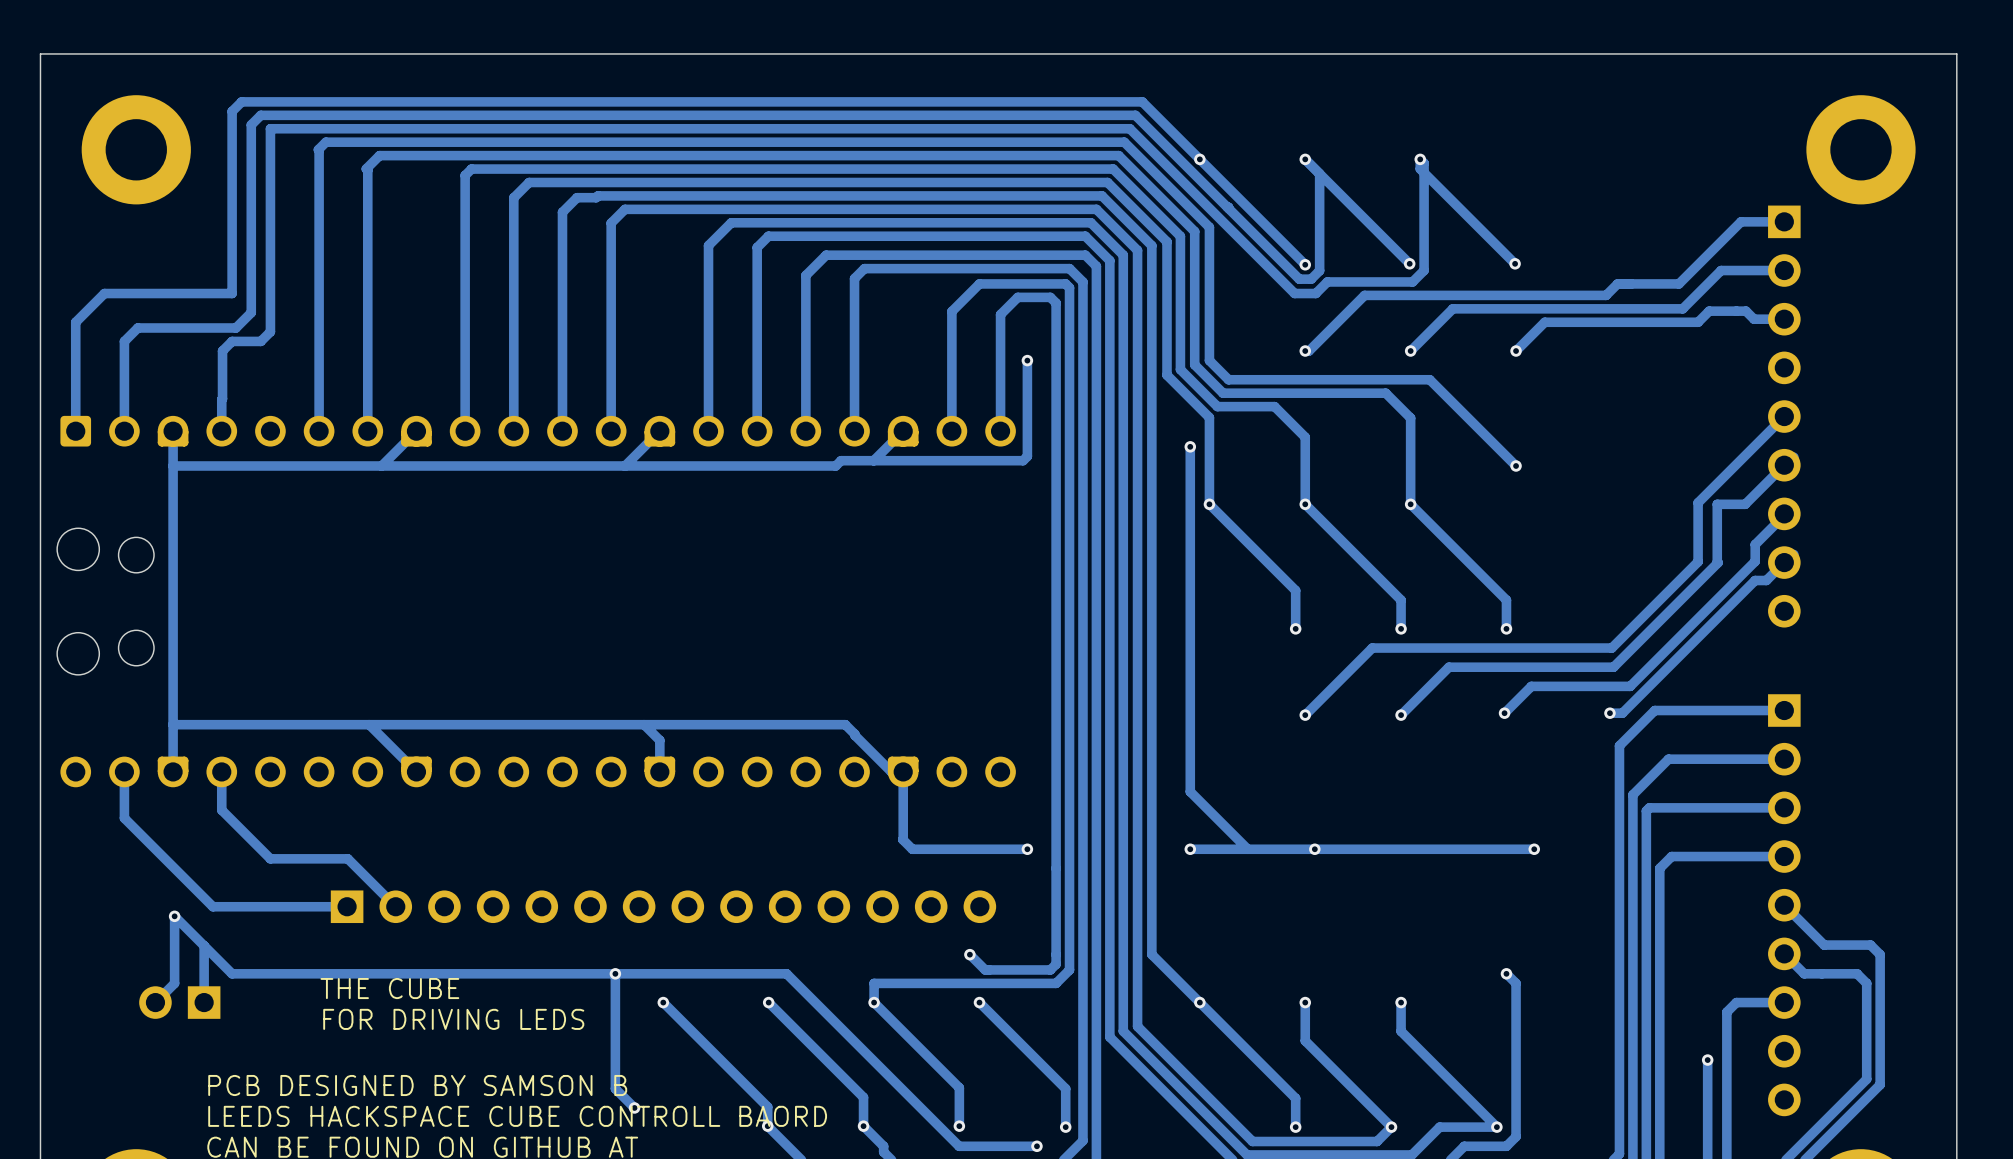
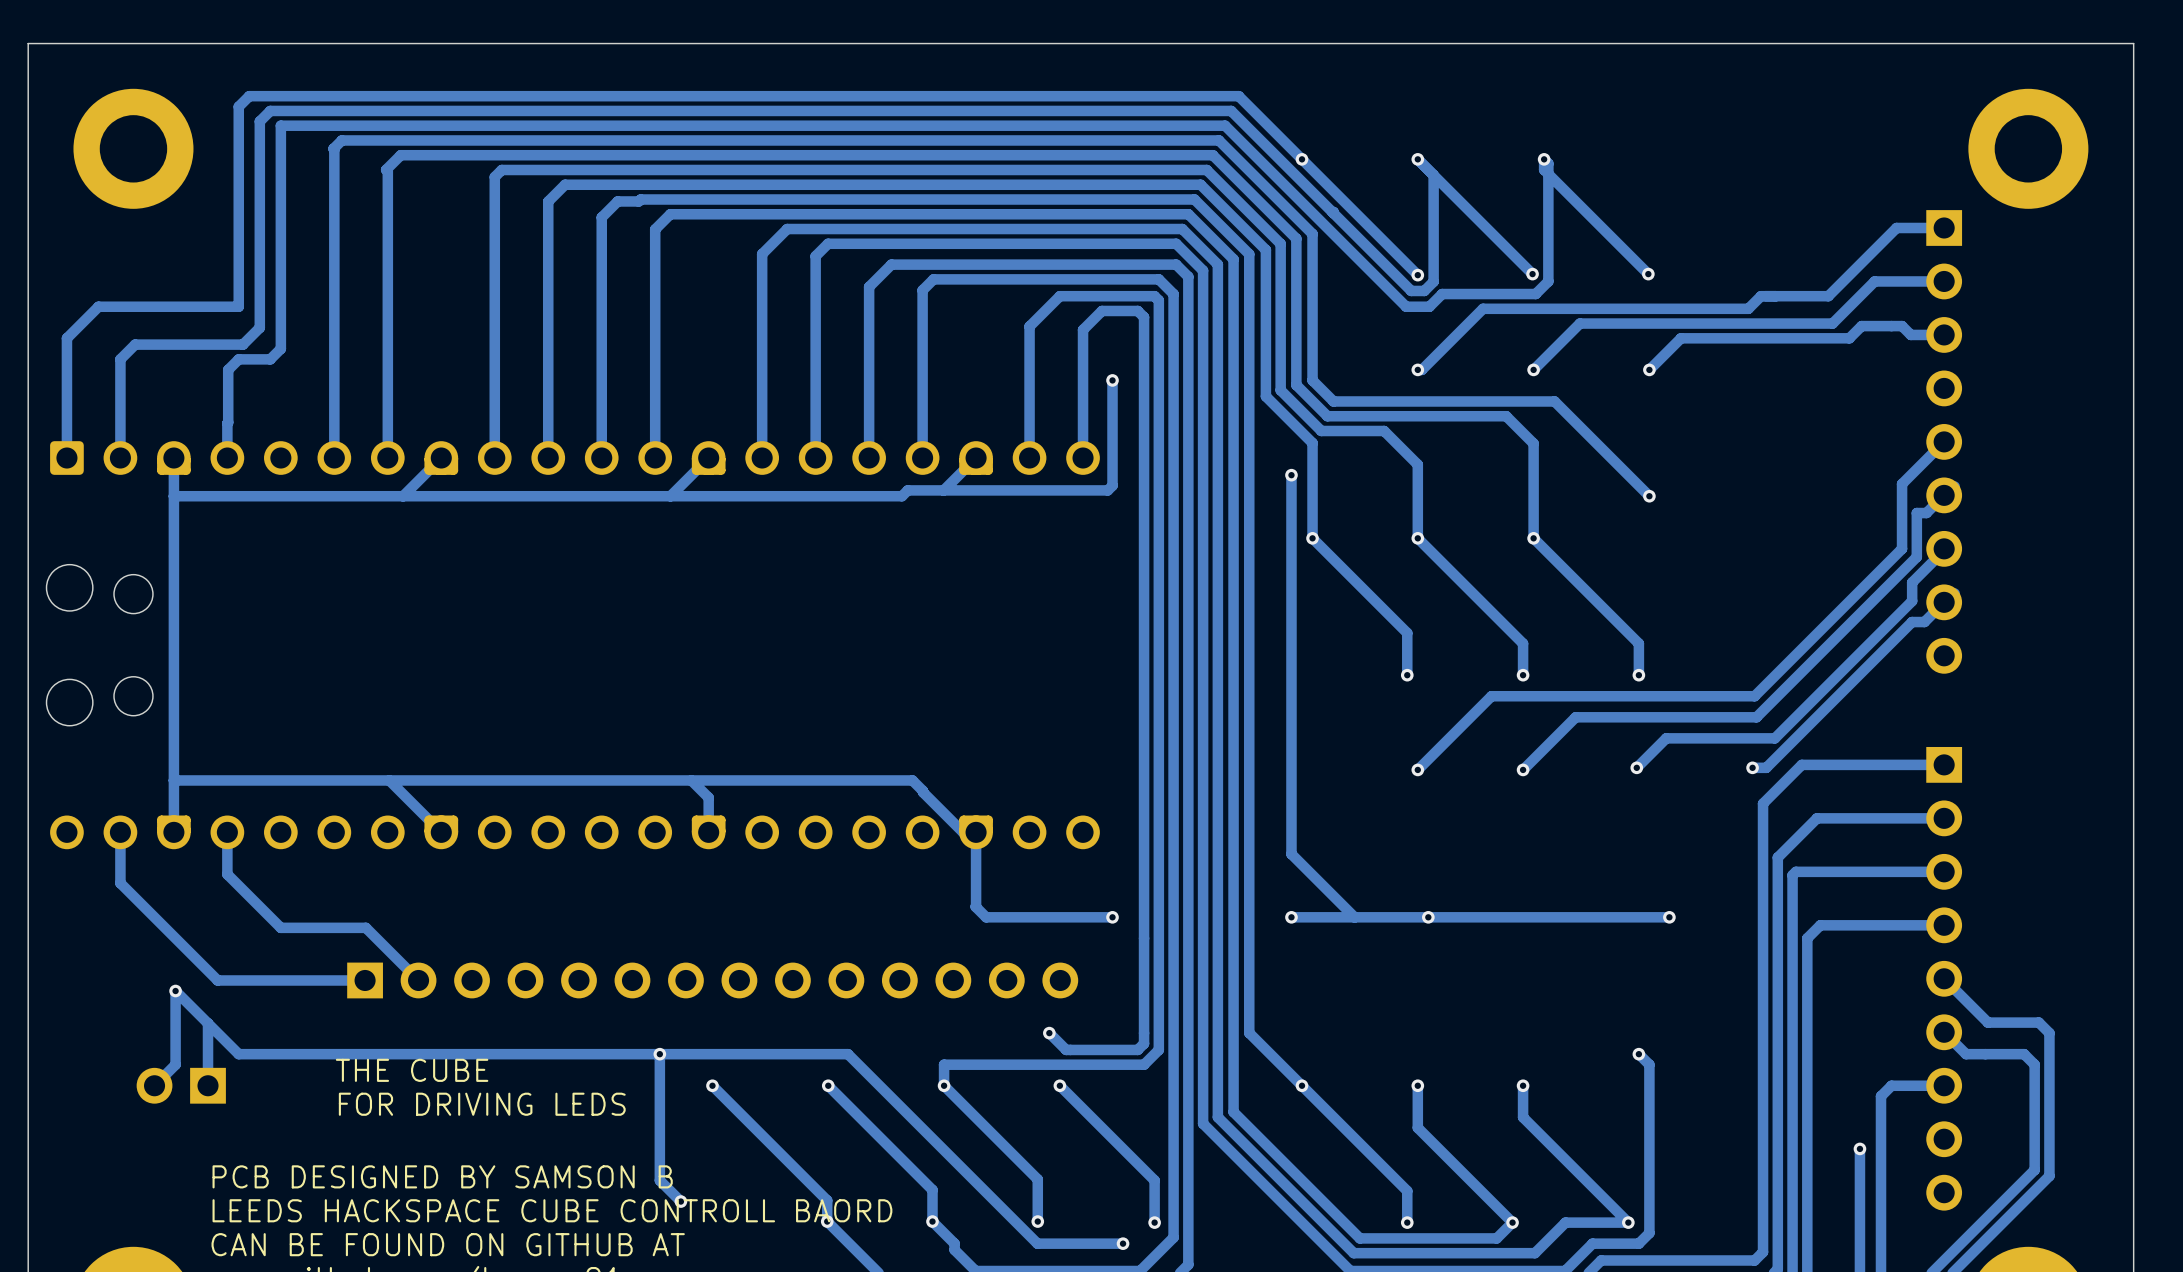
track: (1746, 454) (1698, 502) (1698, 561) -> (1902, 484) (1902, 548) (1849, 601)
track: (1768, 481) (1745, 504) (1717, 504) (1718, 562) -> (1926, 513) (1916, 513) (1916, 557) (1871, 602)

